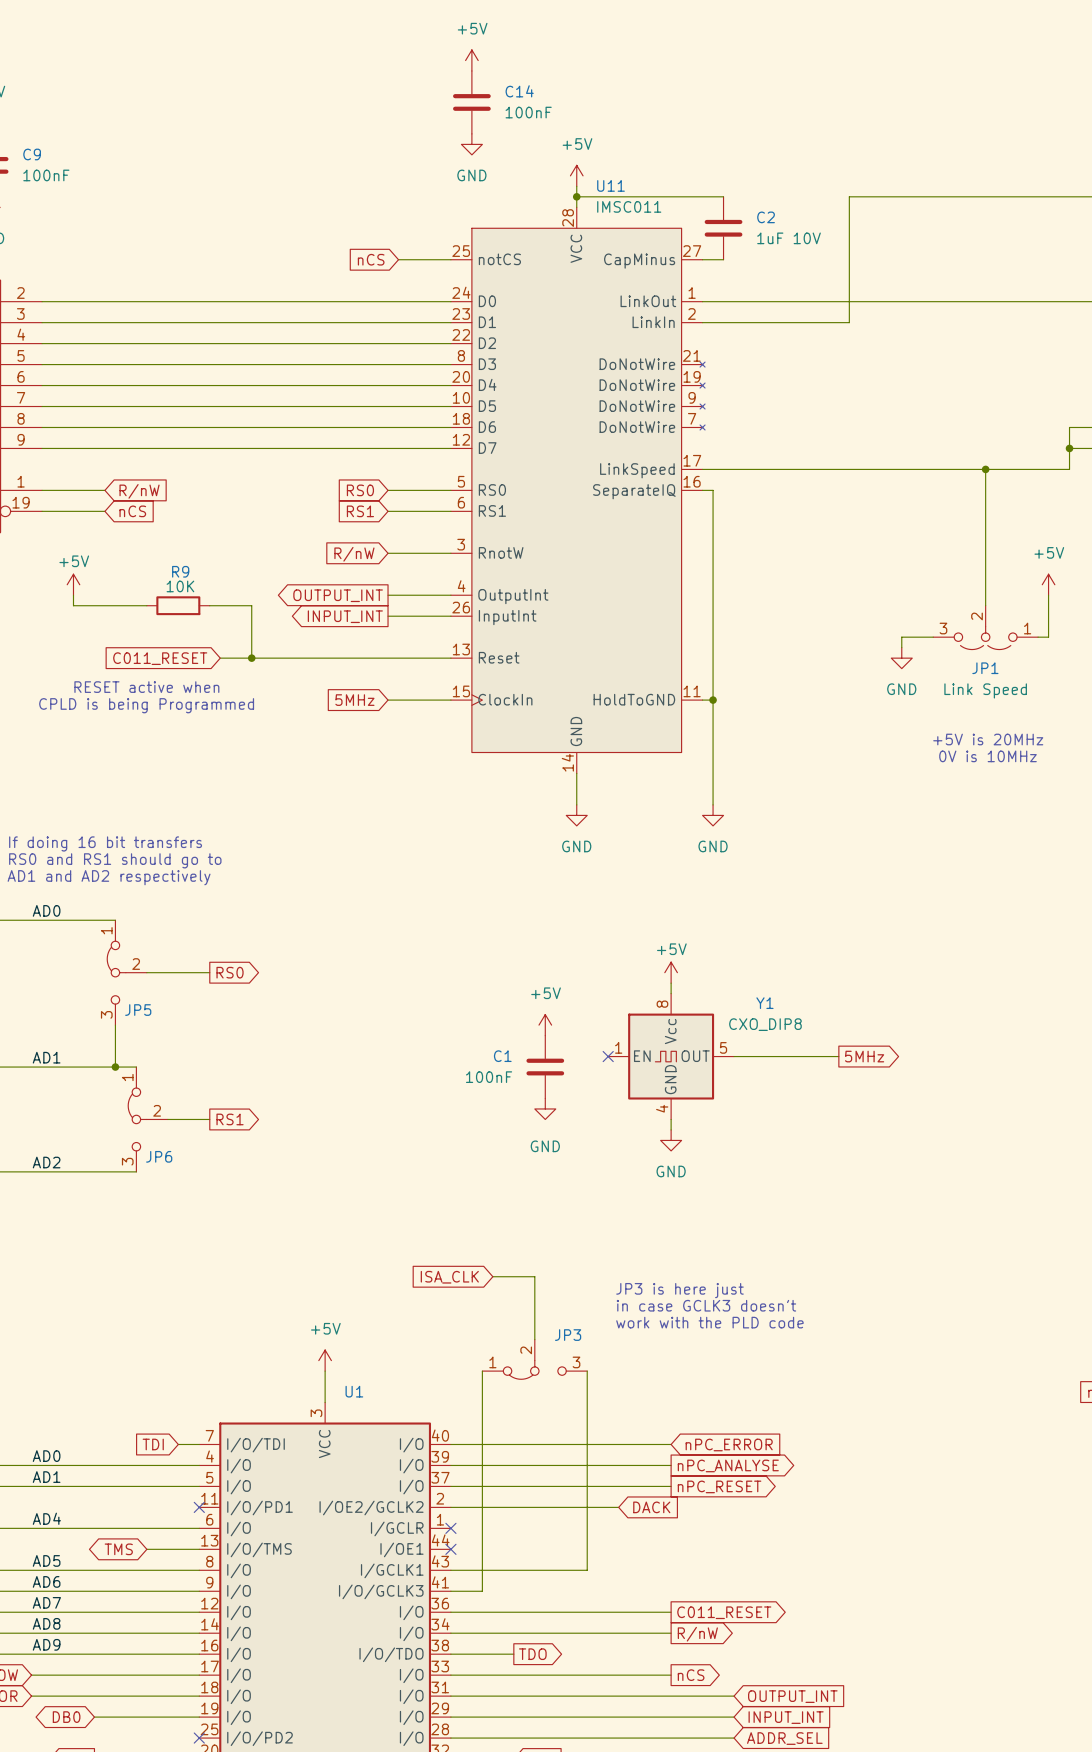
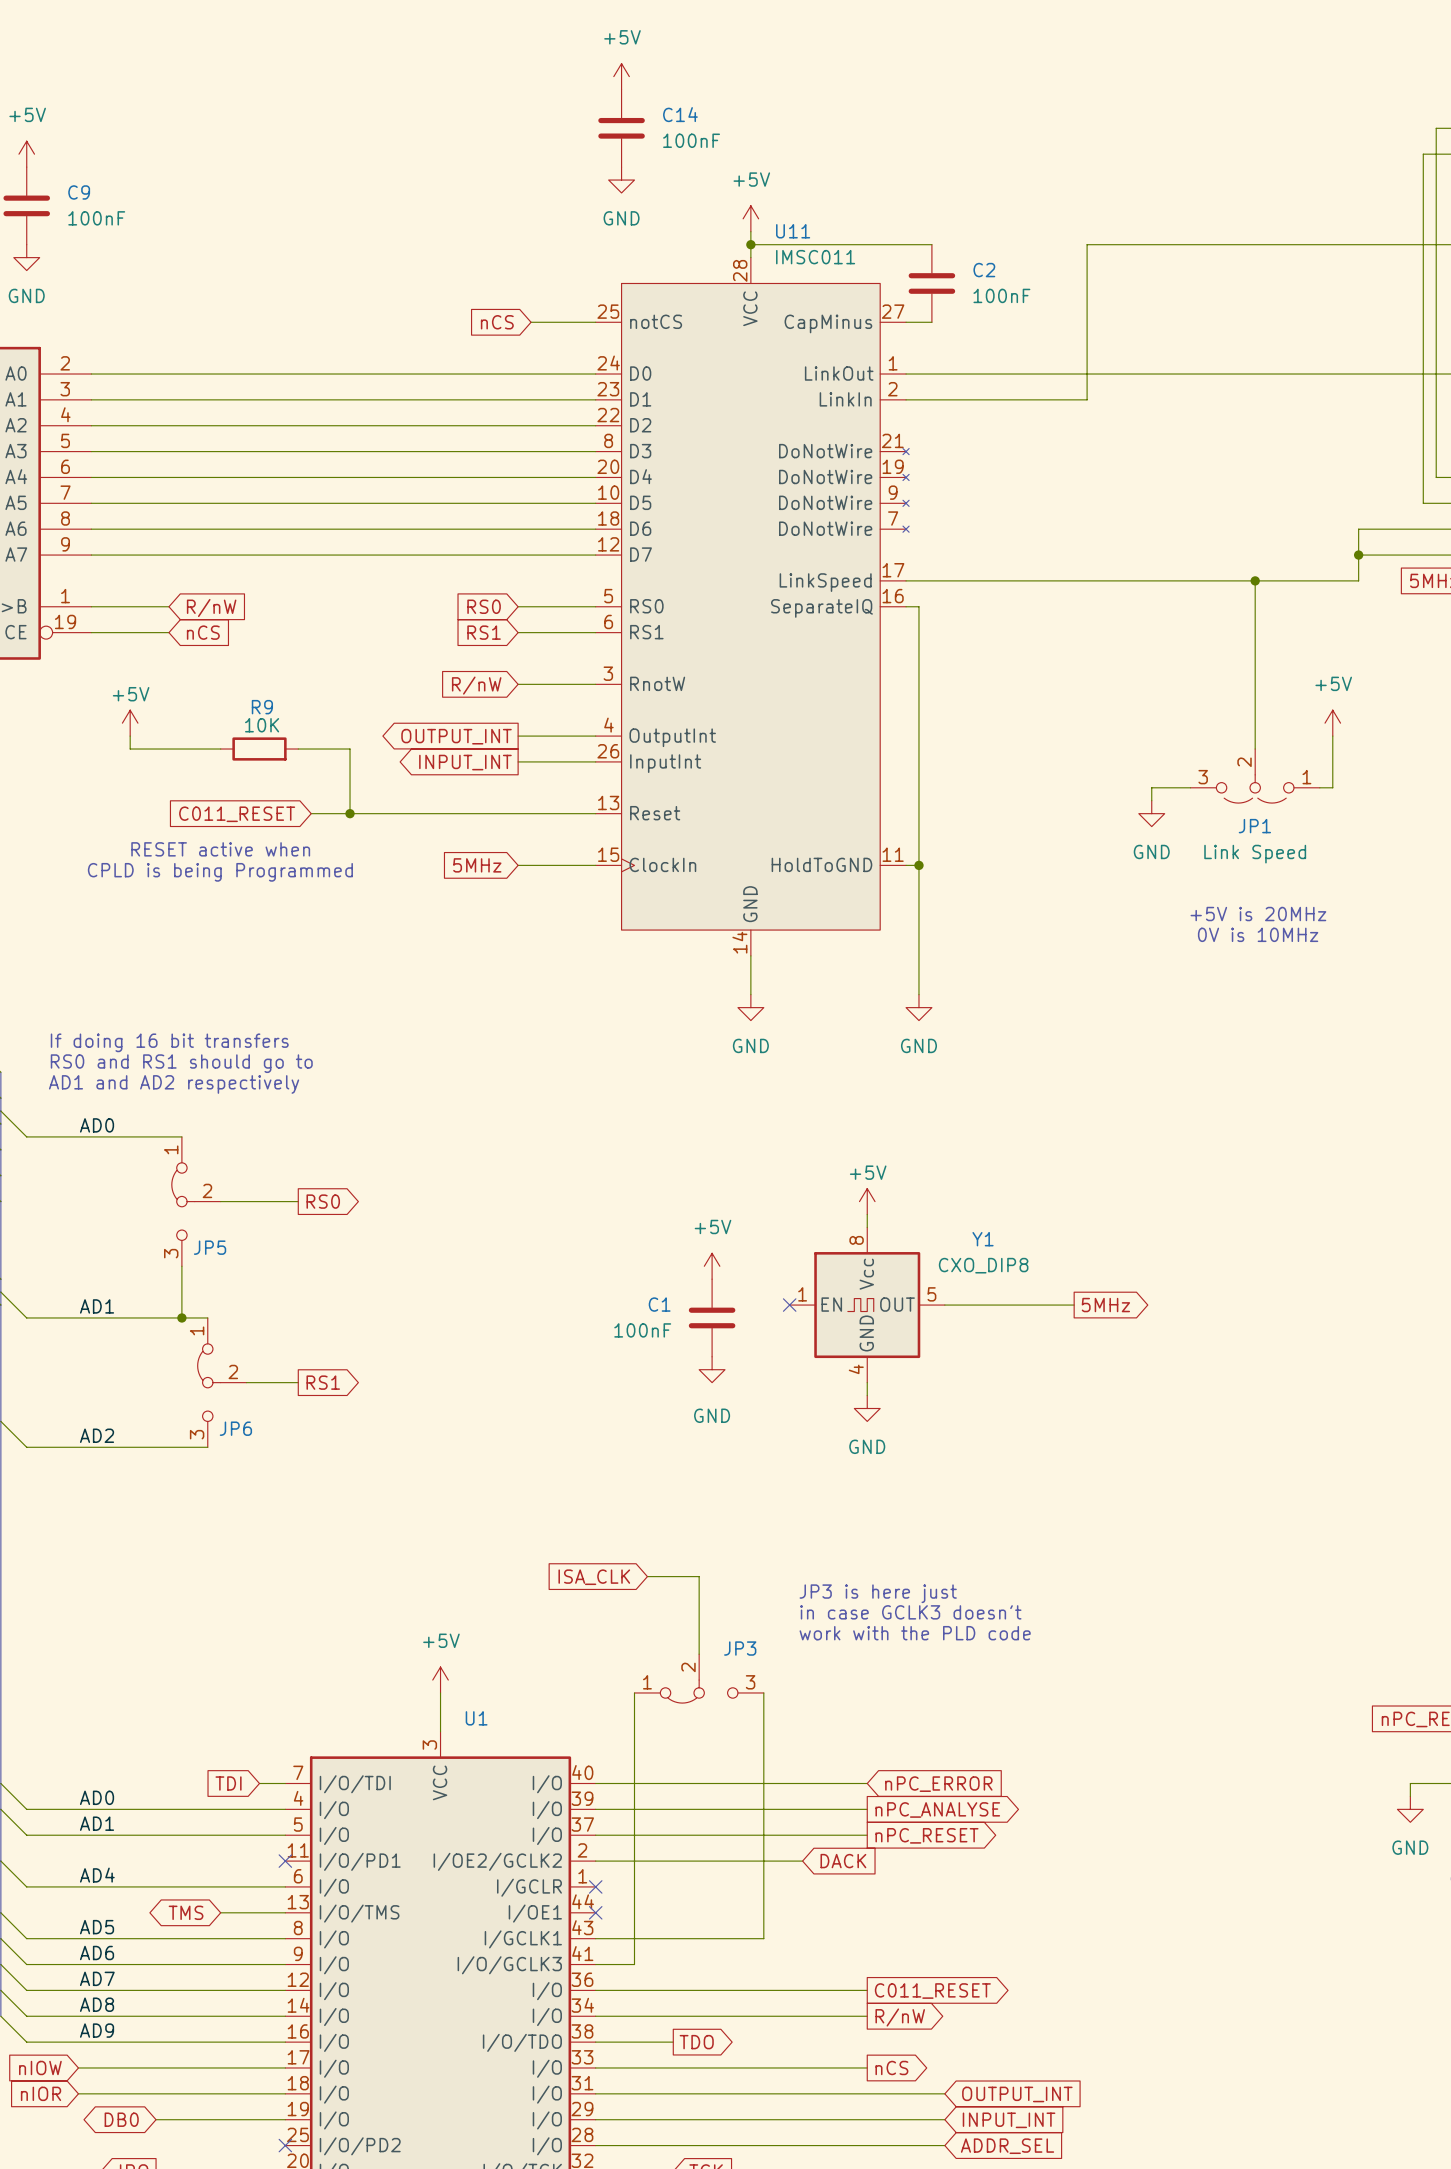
C2 value: 1uF 10V (789, 238) -> 100nF (1001, 295)

